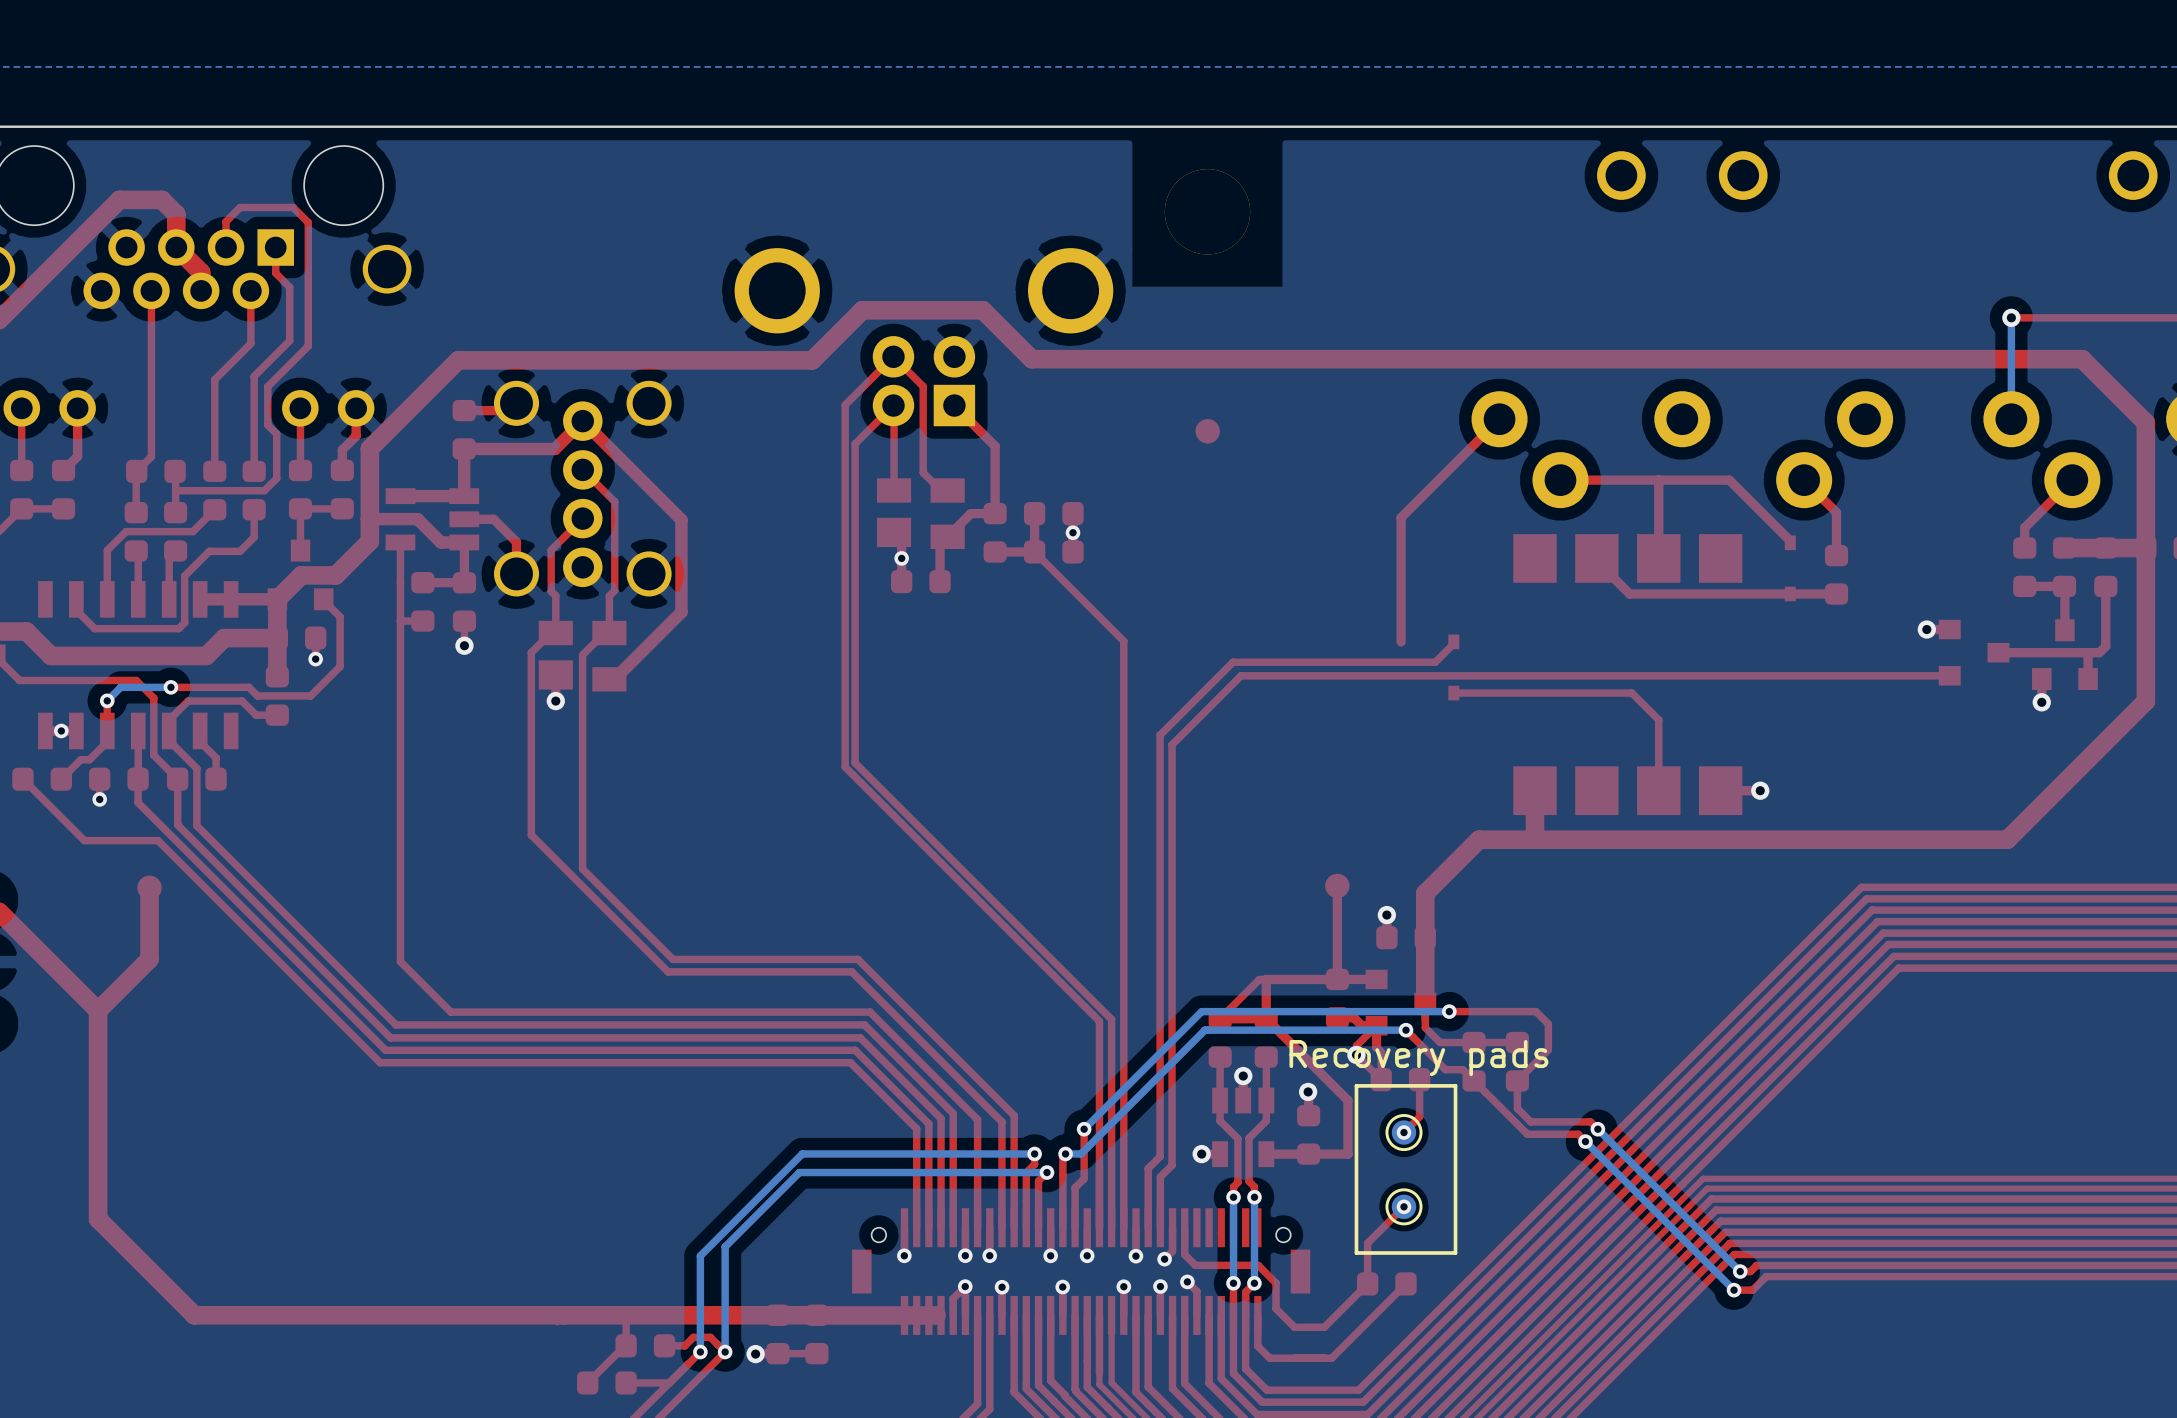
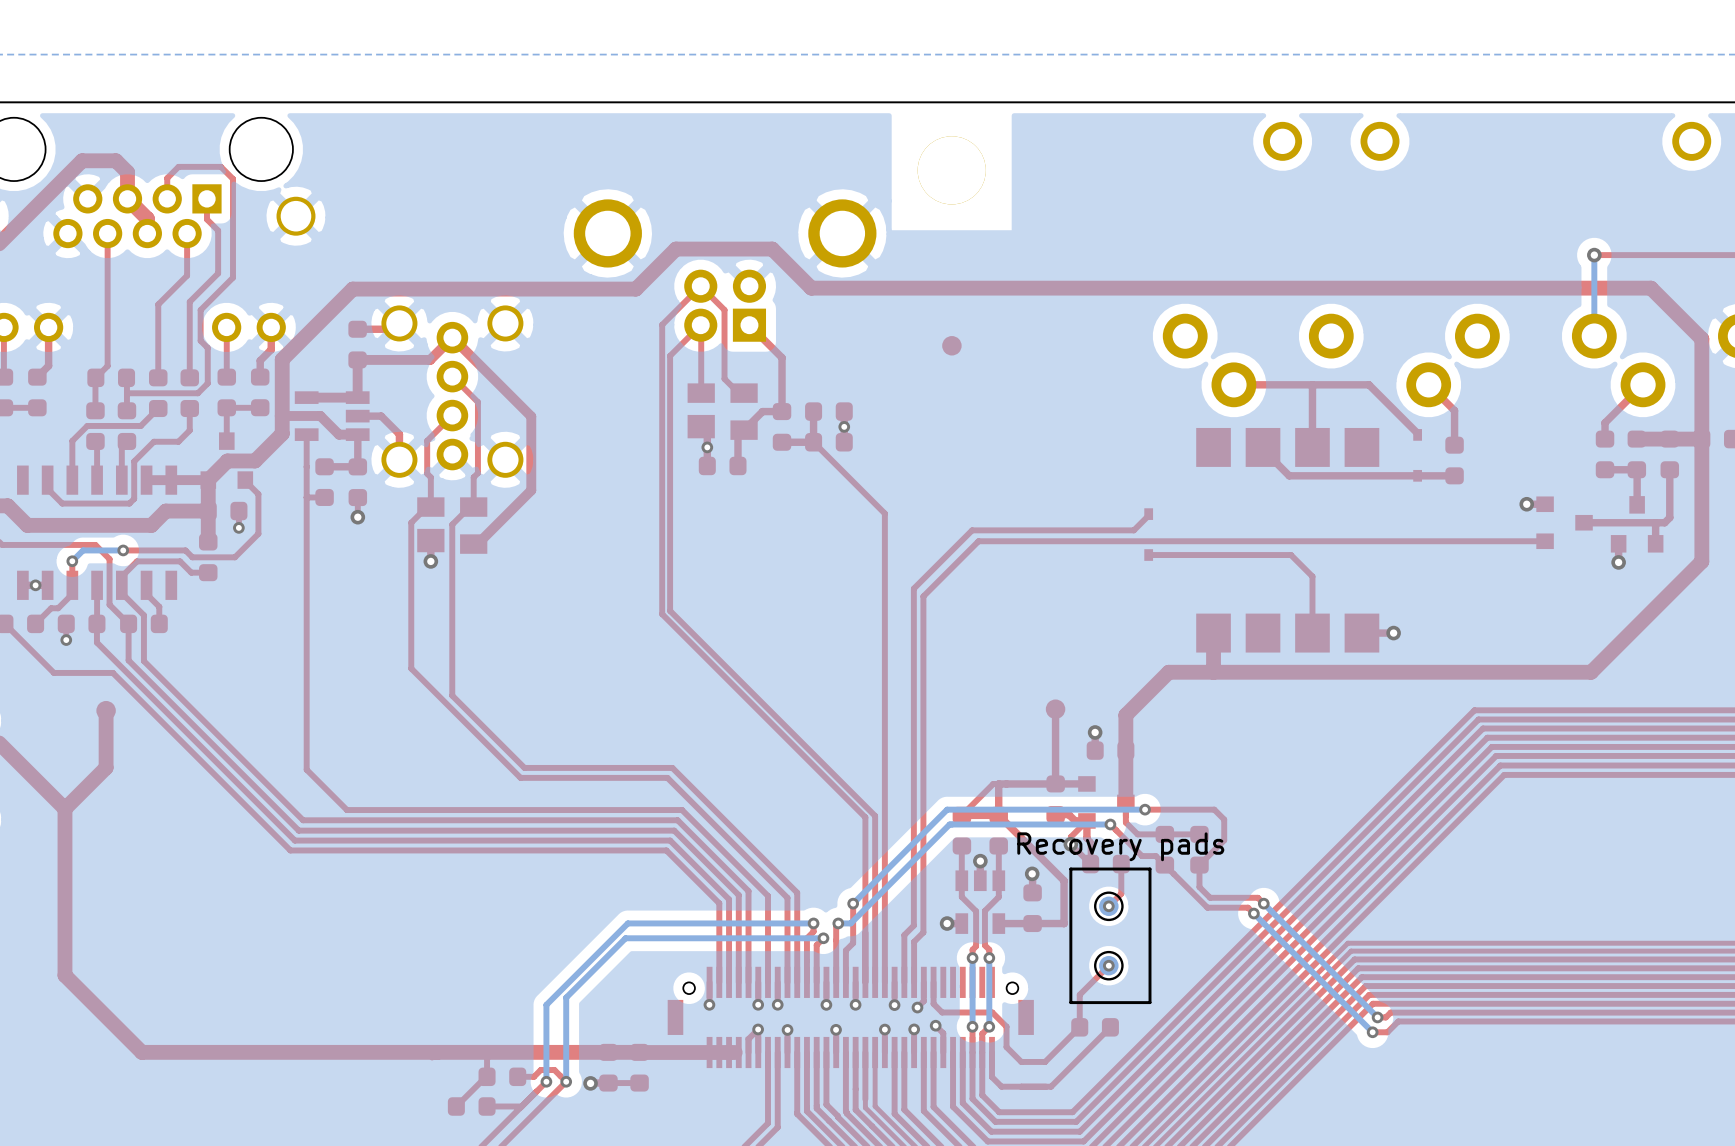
top track: (1499, 419) (1401, 517) (1401, 641) -> none

